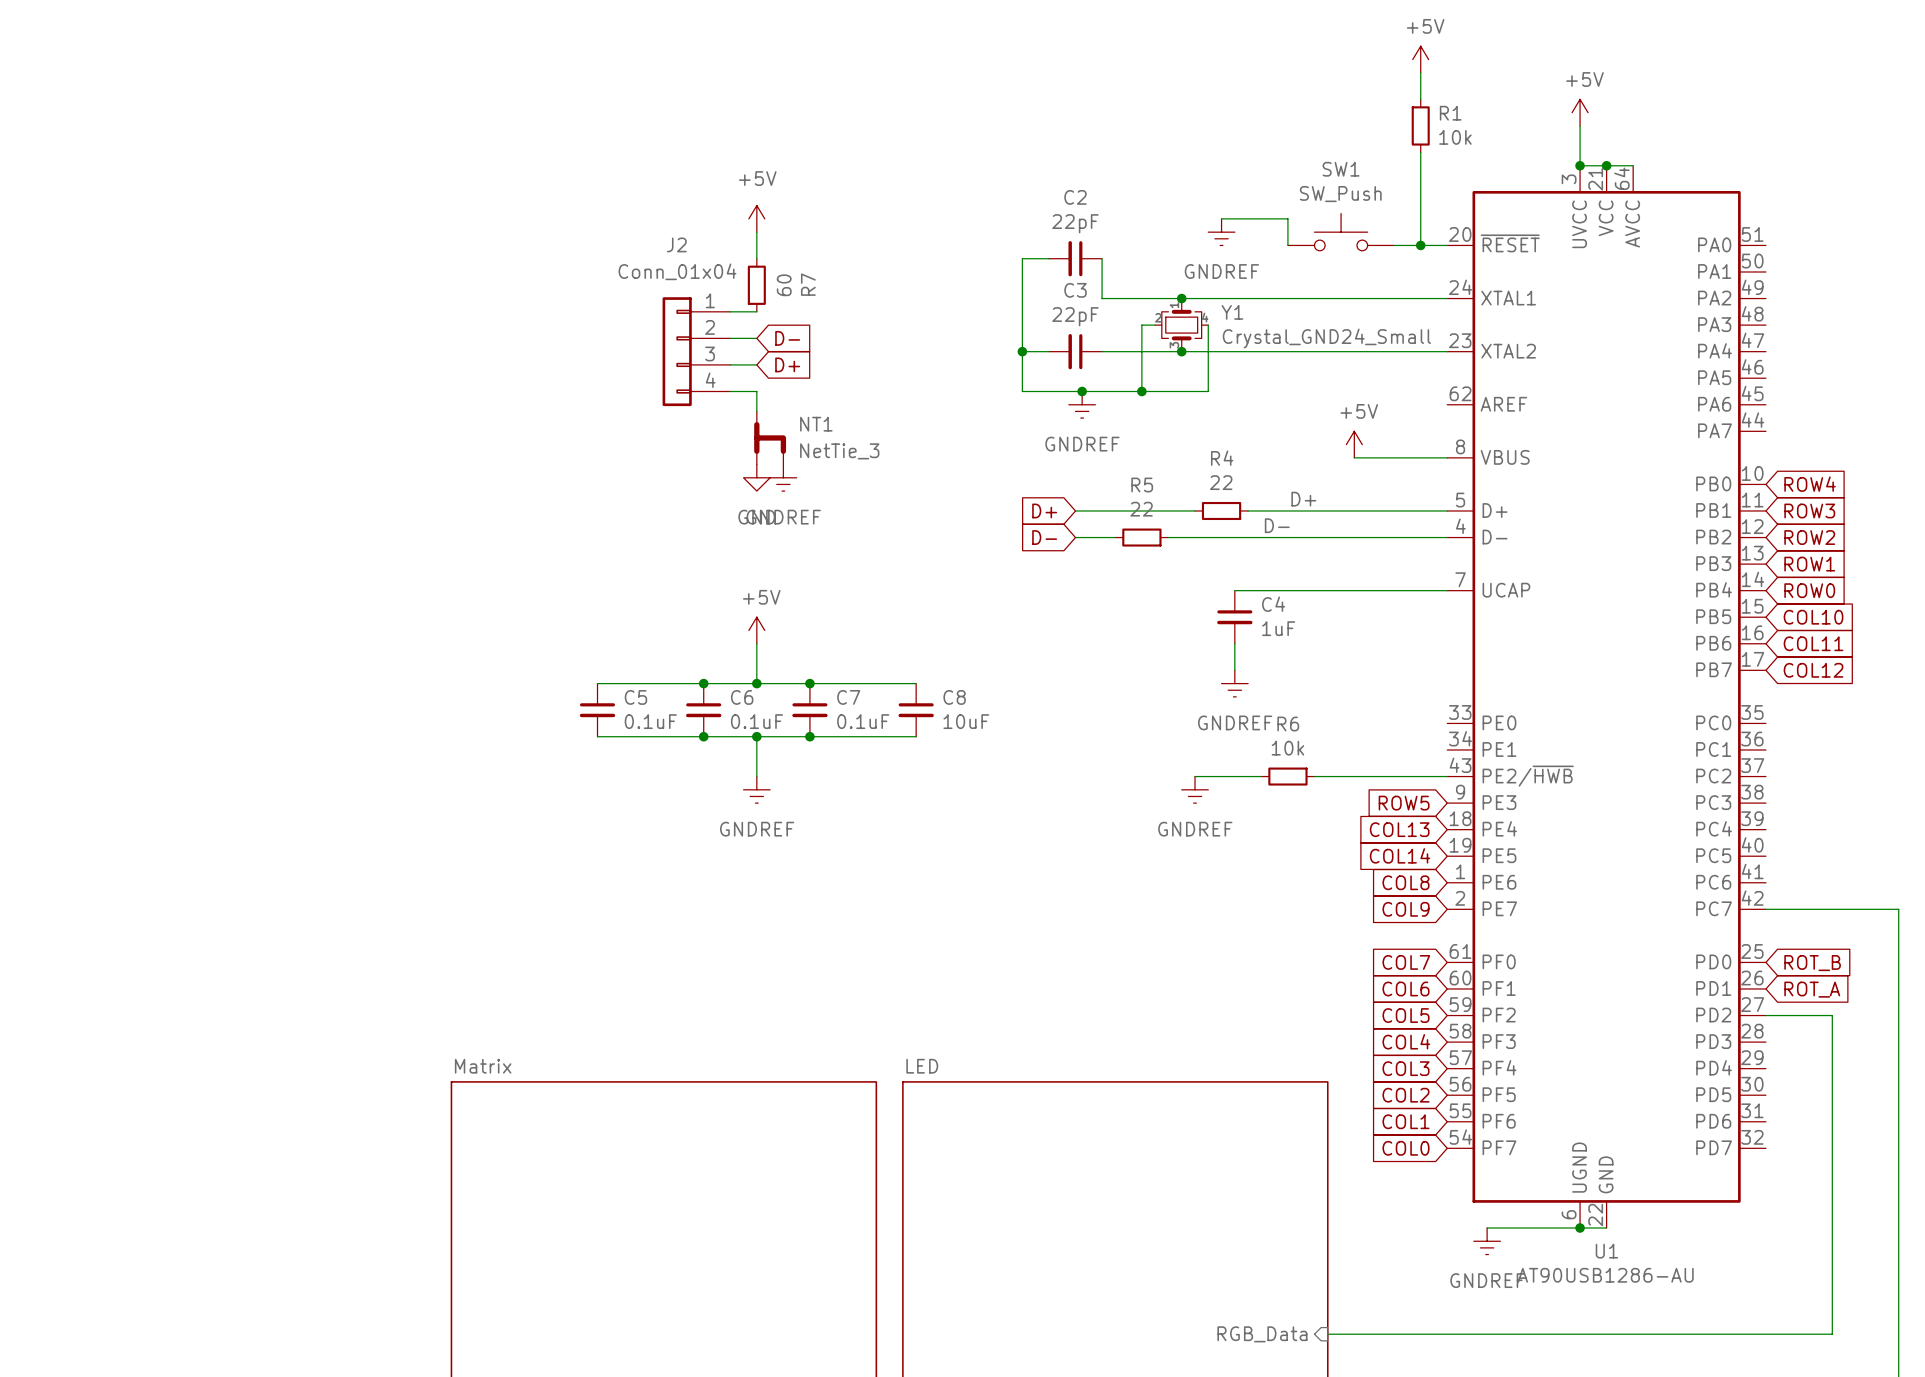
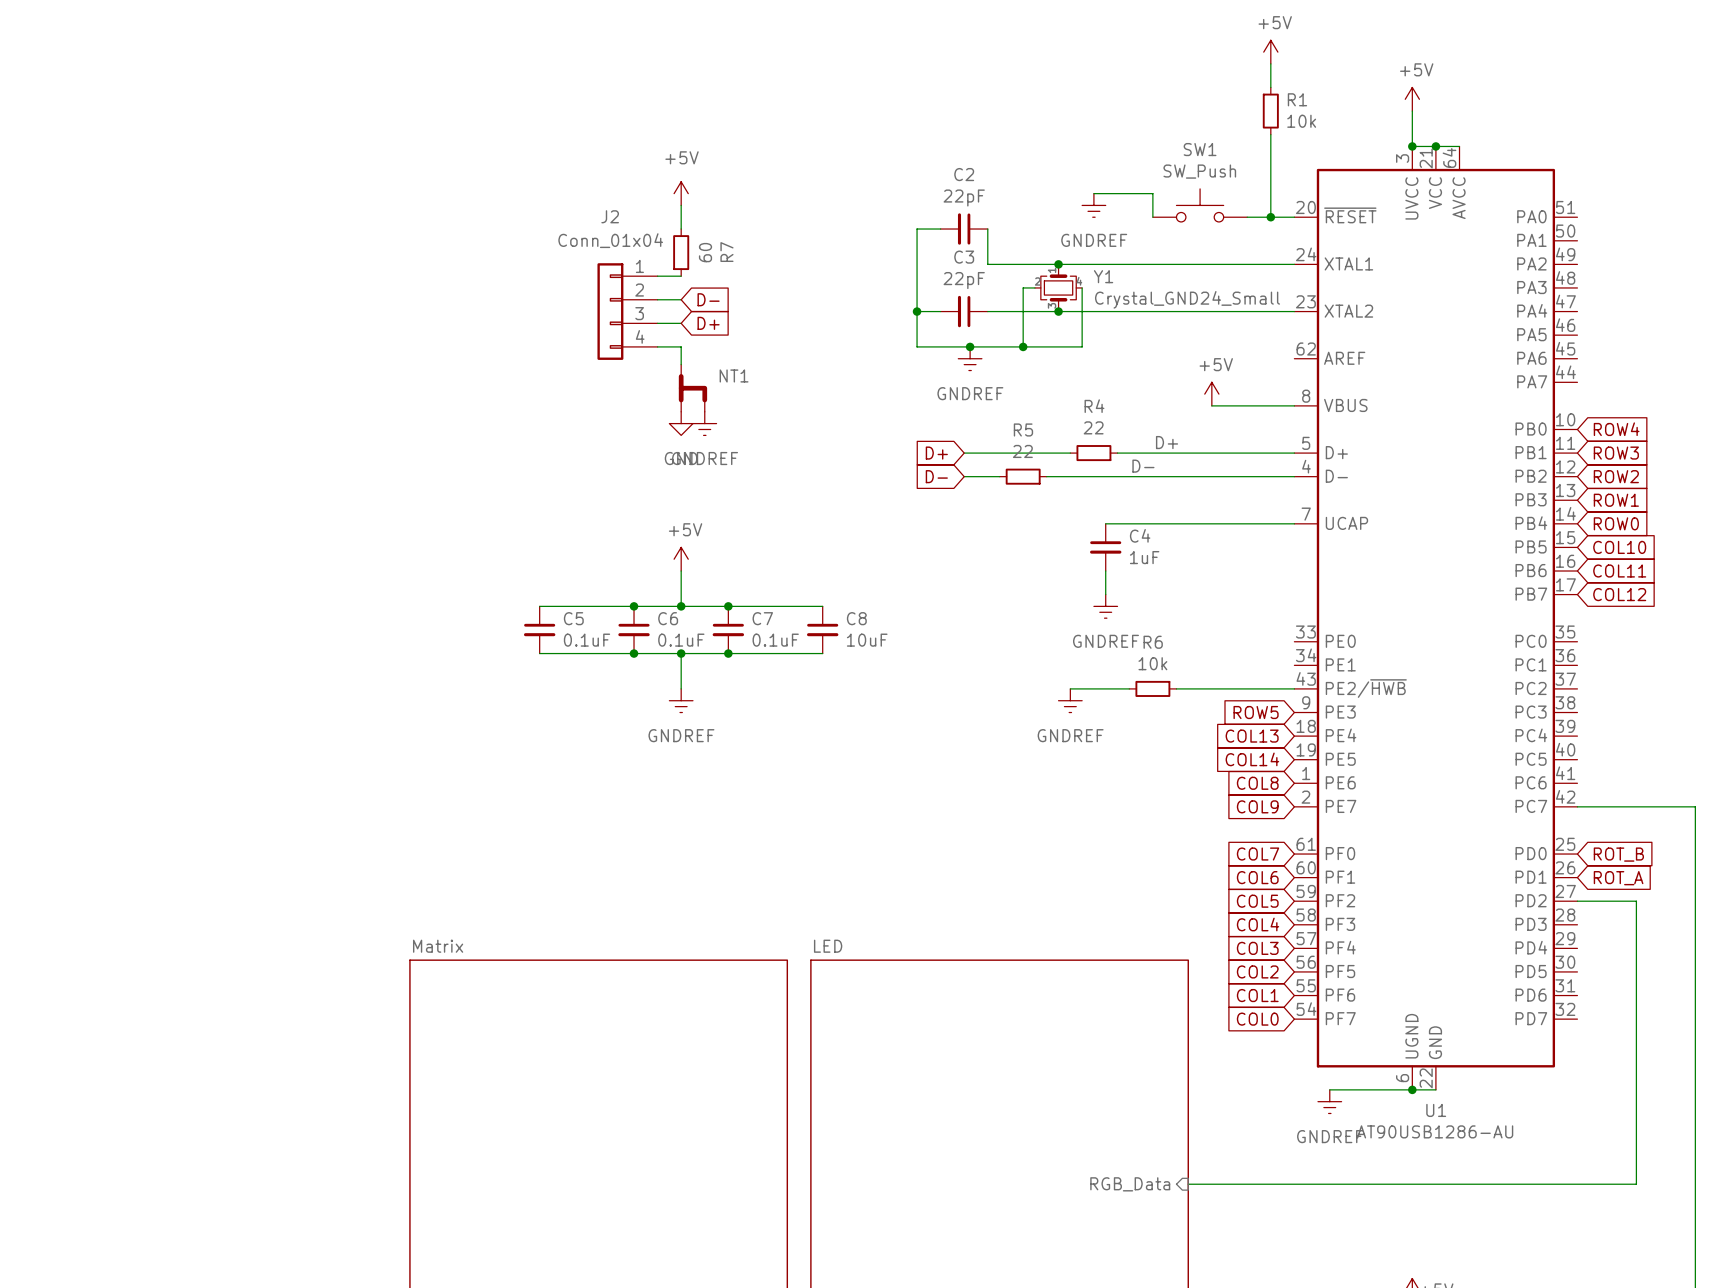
NT1 value: NetTie_3 (839, 451) -> none

